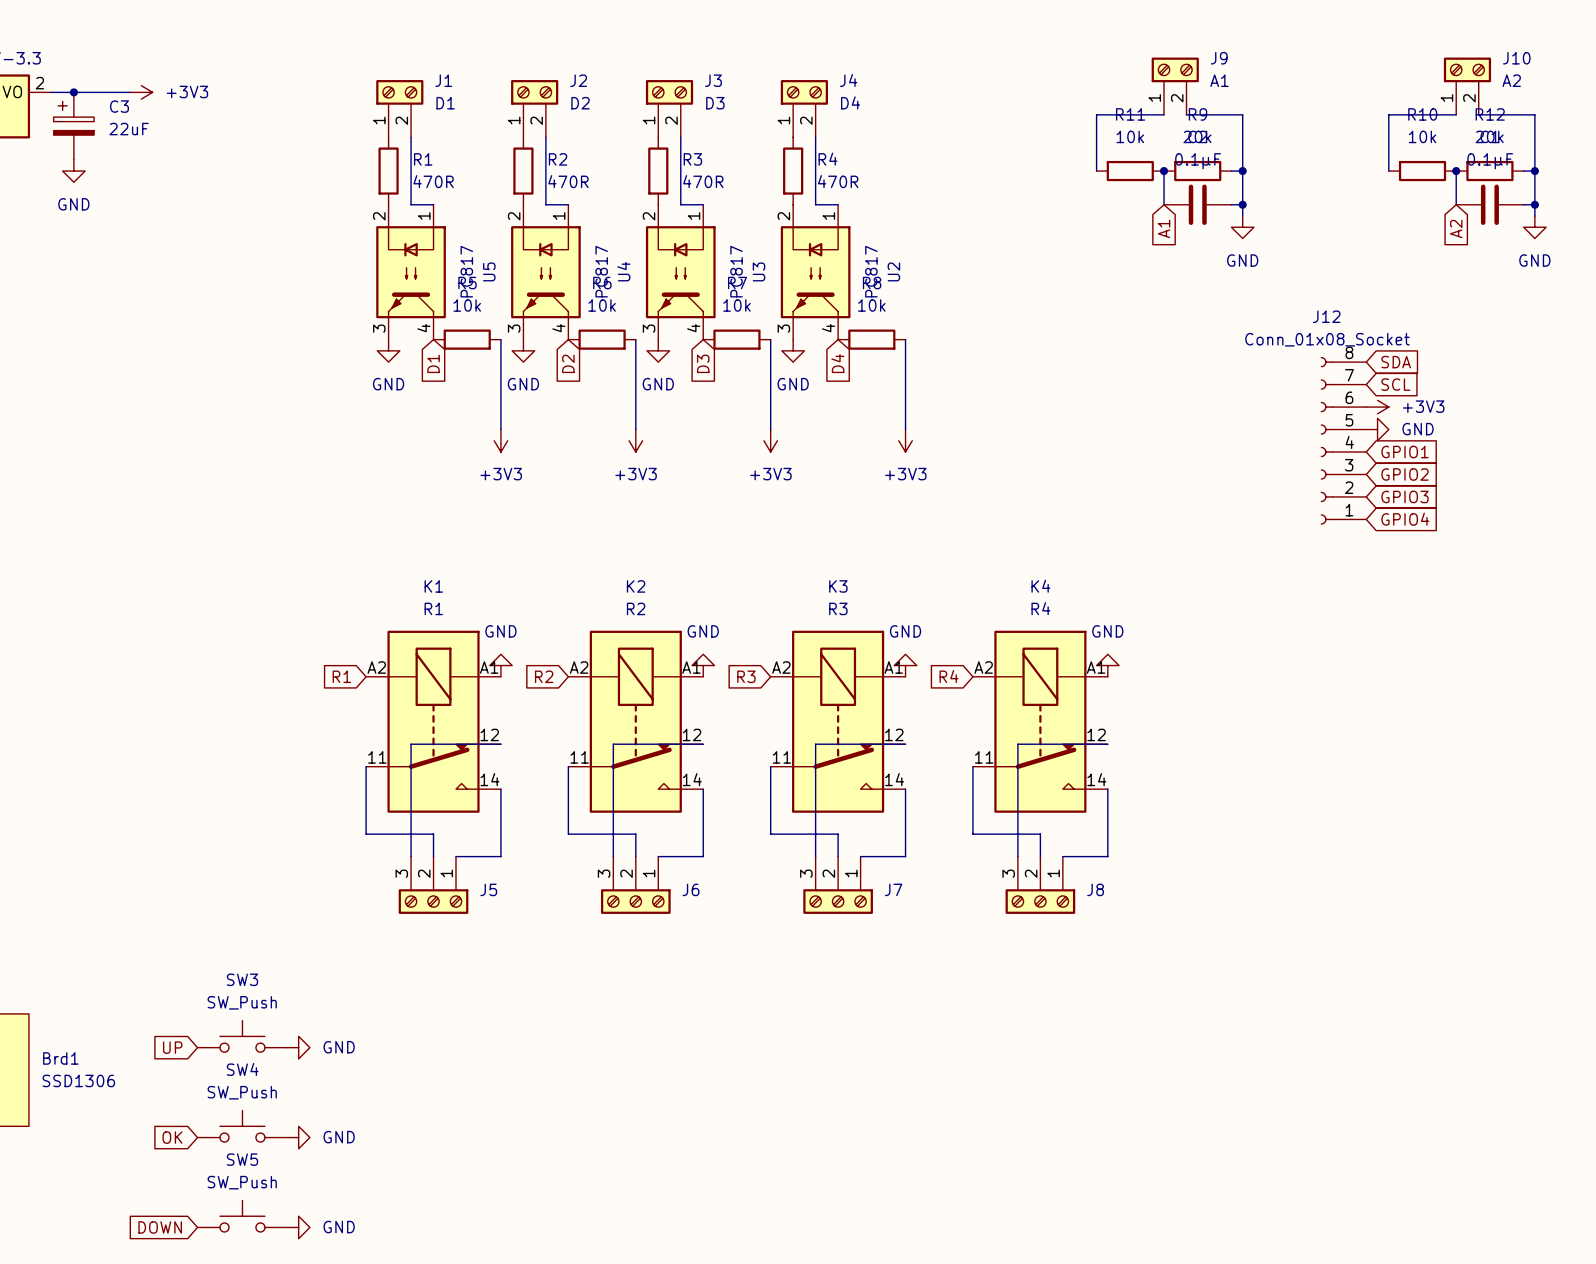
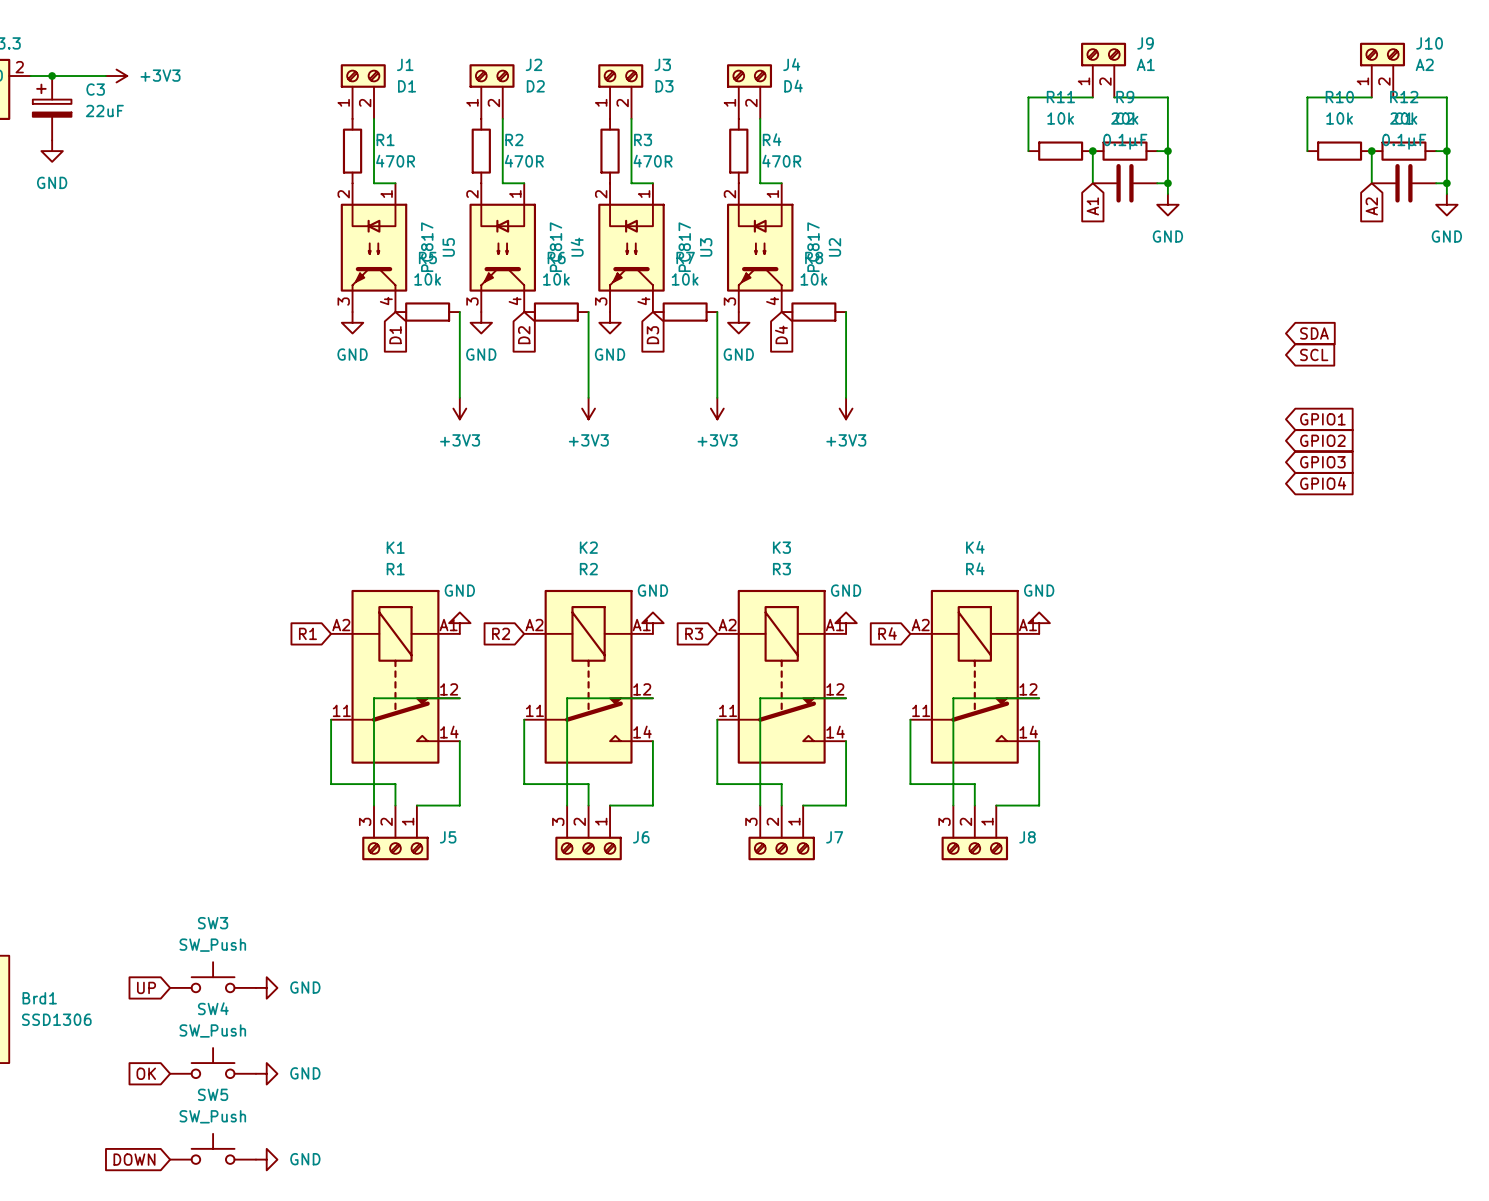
power symbol: +3V3 (1377, 407) -> none
power symbol: GND (1377, 429) -> none
J12: Conn_01x08_Socket (1343, 440) -> none

